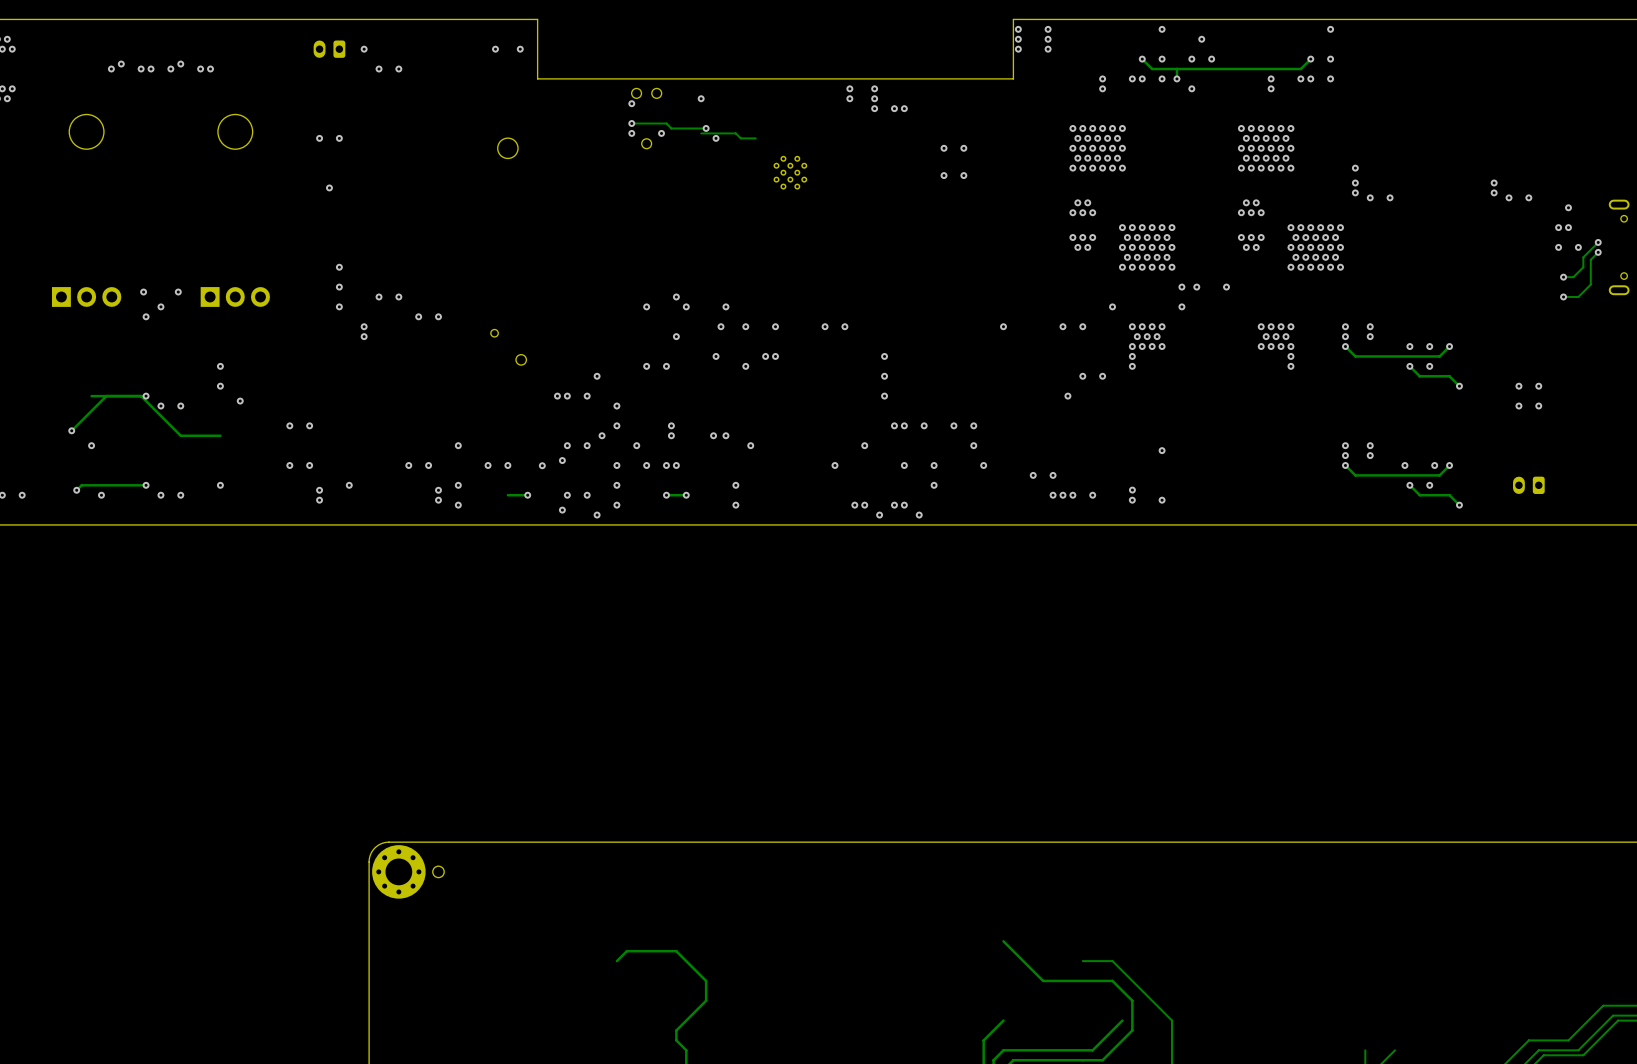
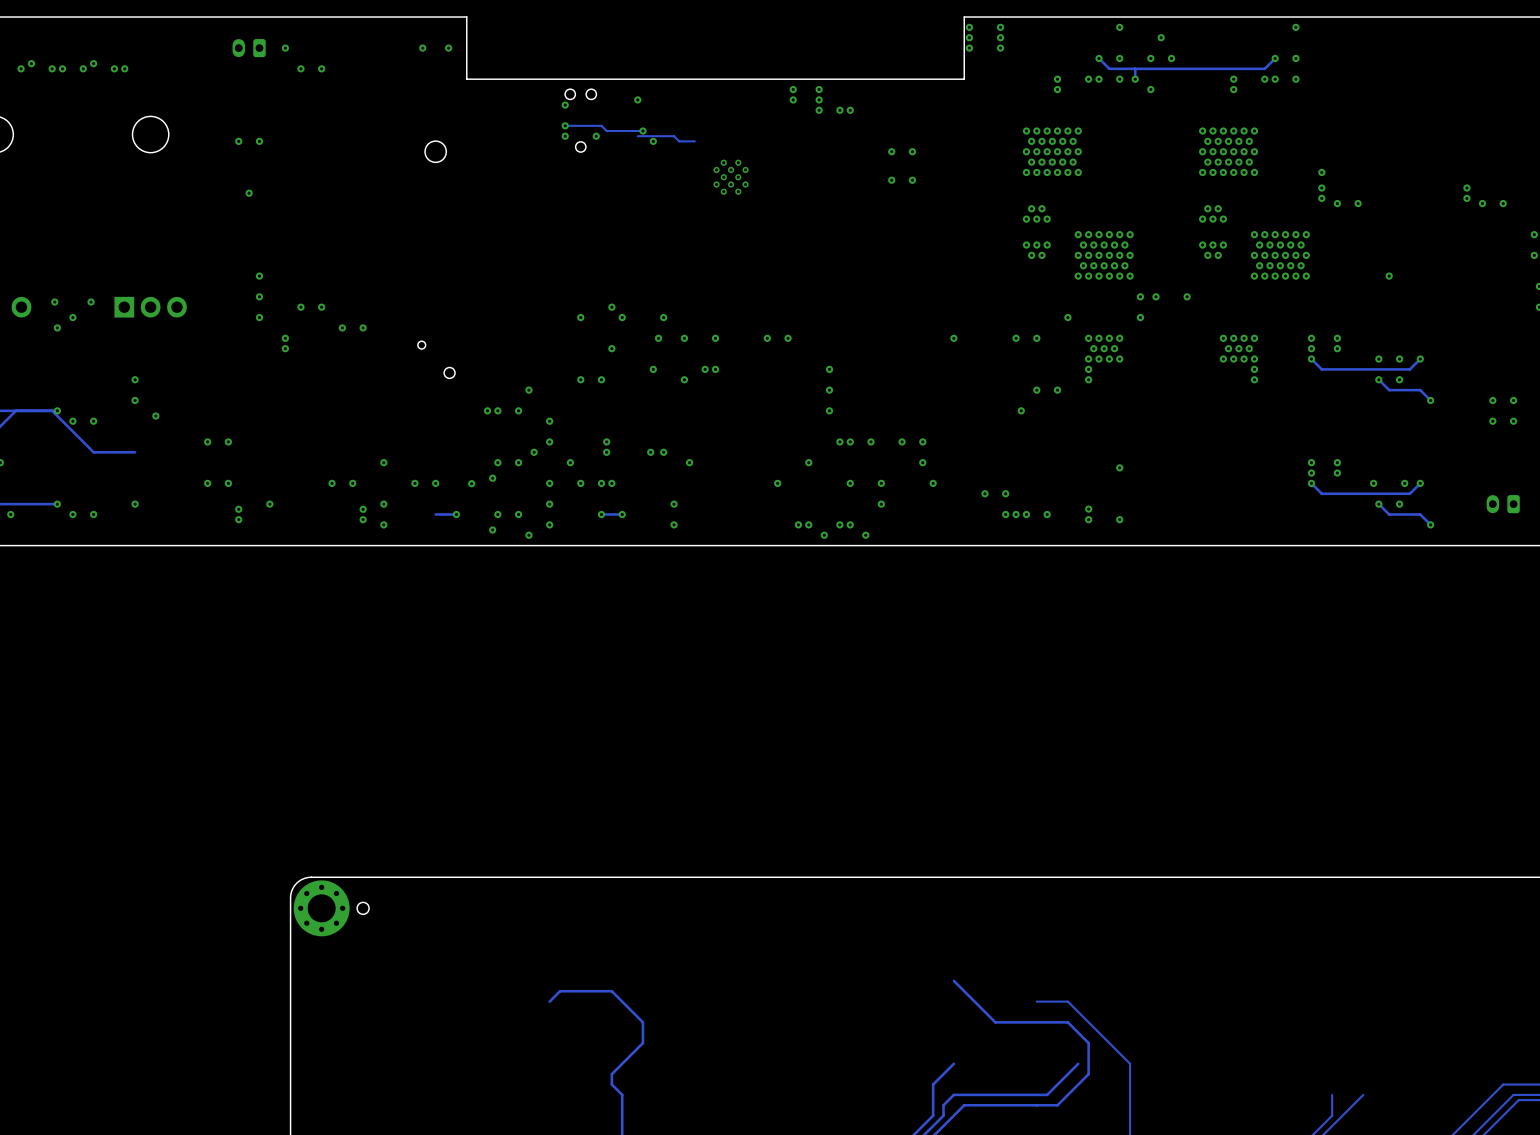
via: none -> (1389, 276)

